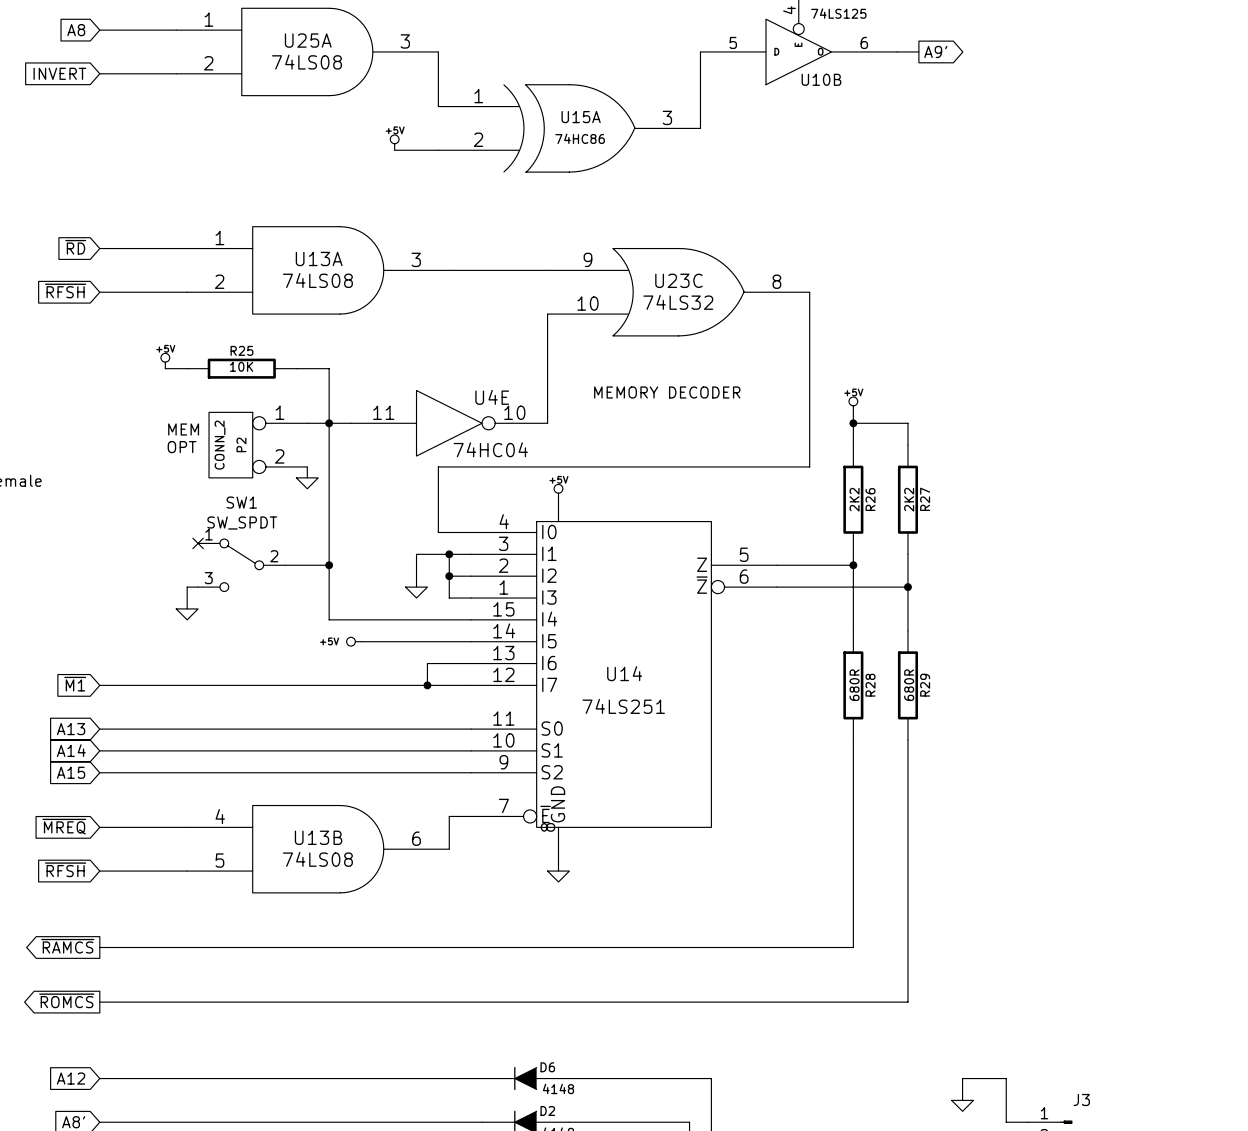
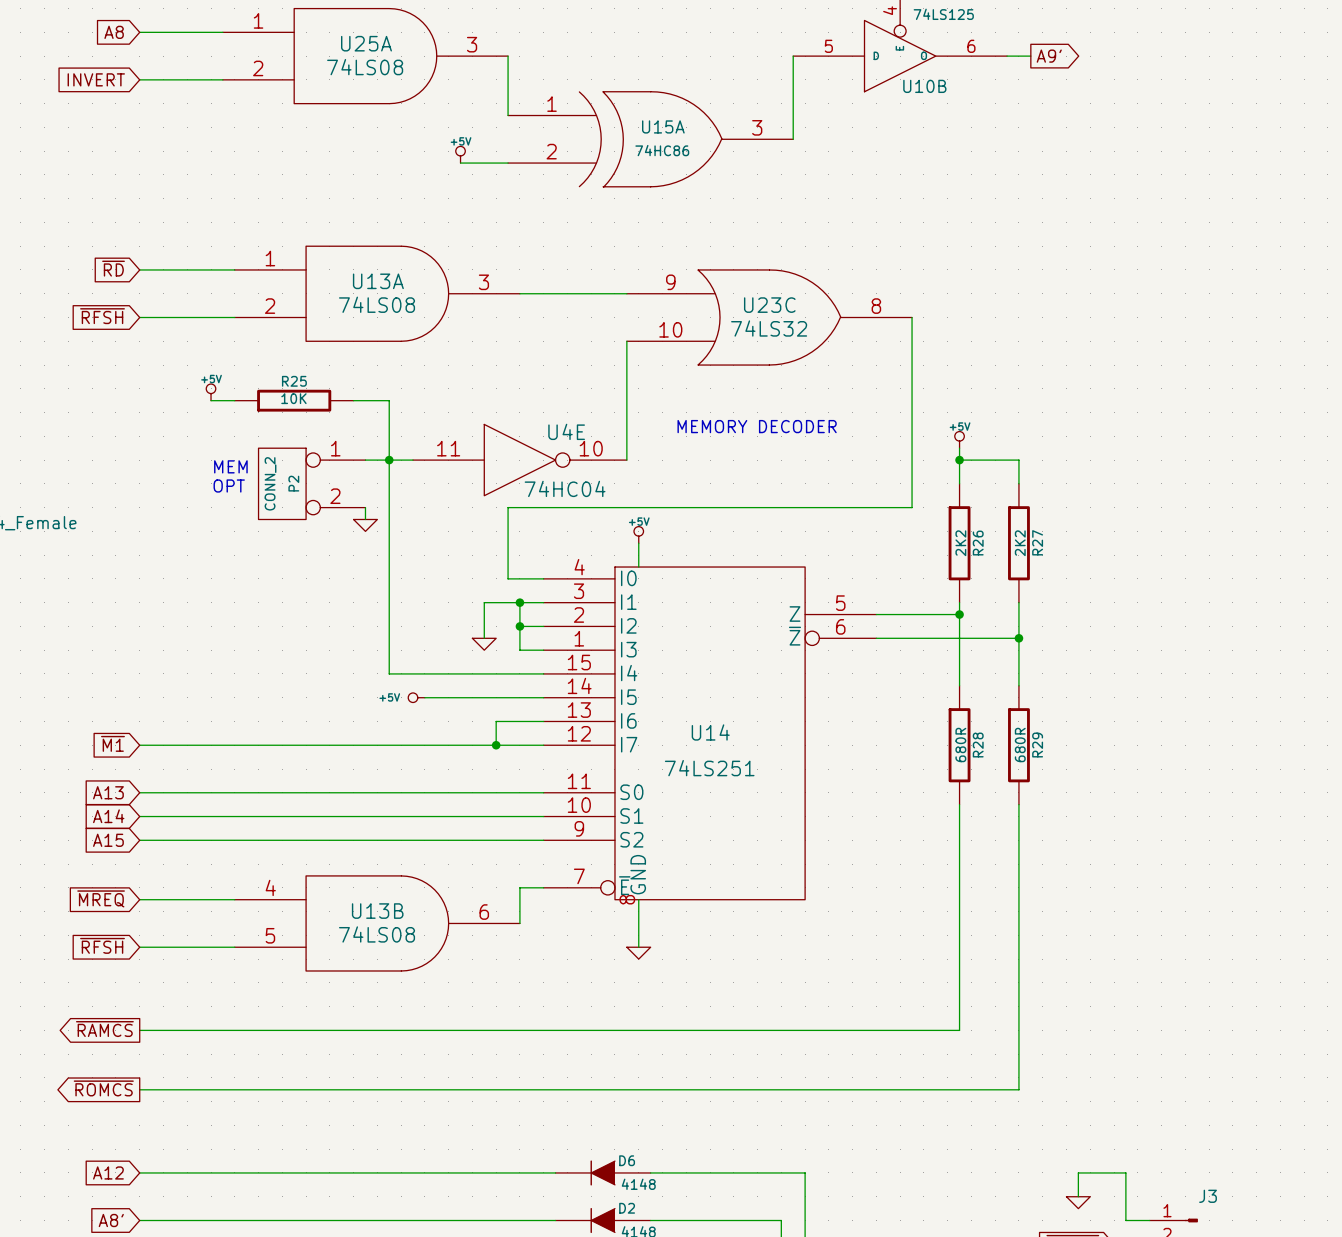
no-connect mark: (198, 543) -> none
SW1: SW_SPDT (241, 565) -> none
wire: (285, 565) (329, 565) -> none
junction: (329, 565) -> none
wire: (198, 587) (187, 587) (187, 608) -> none
power symbol: (187, 614) -> none

